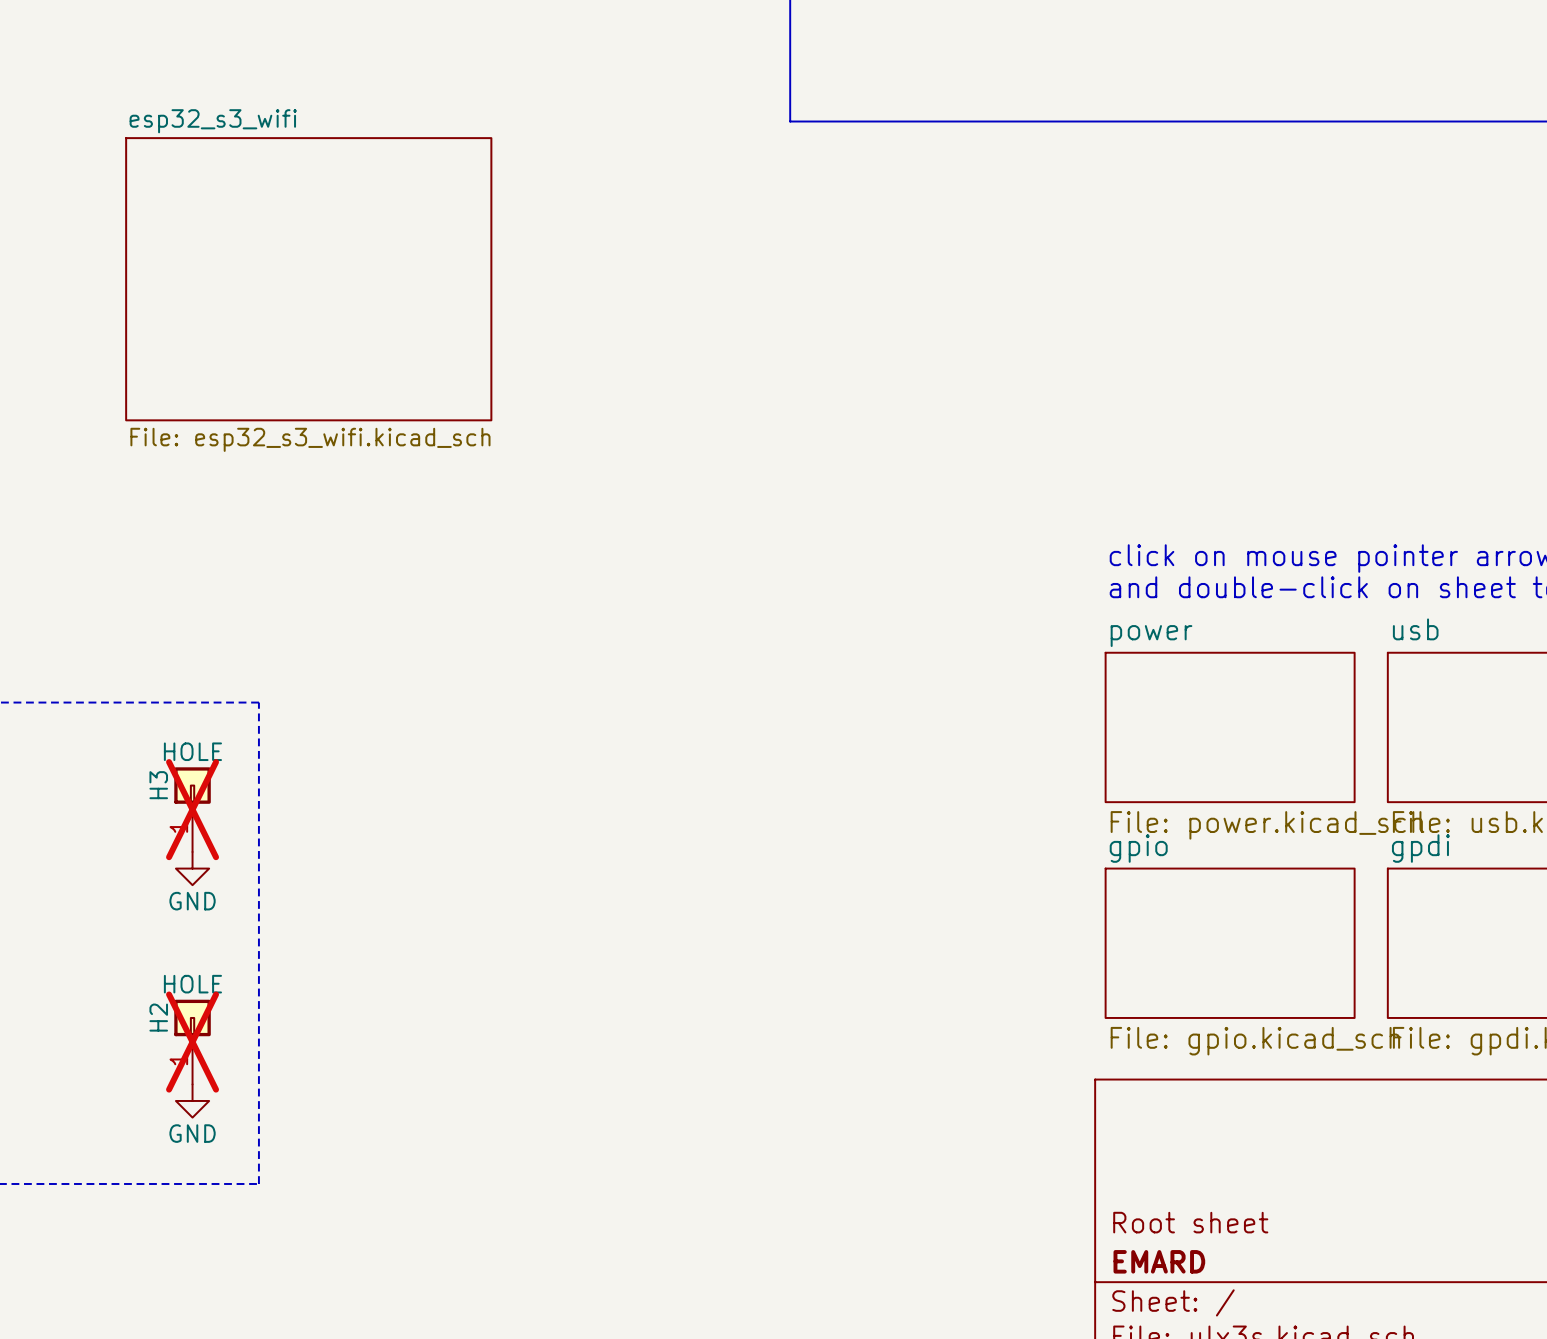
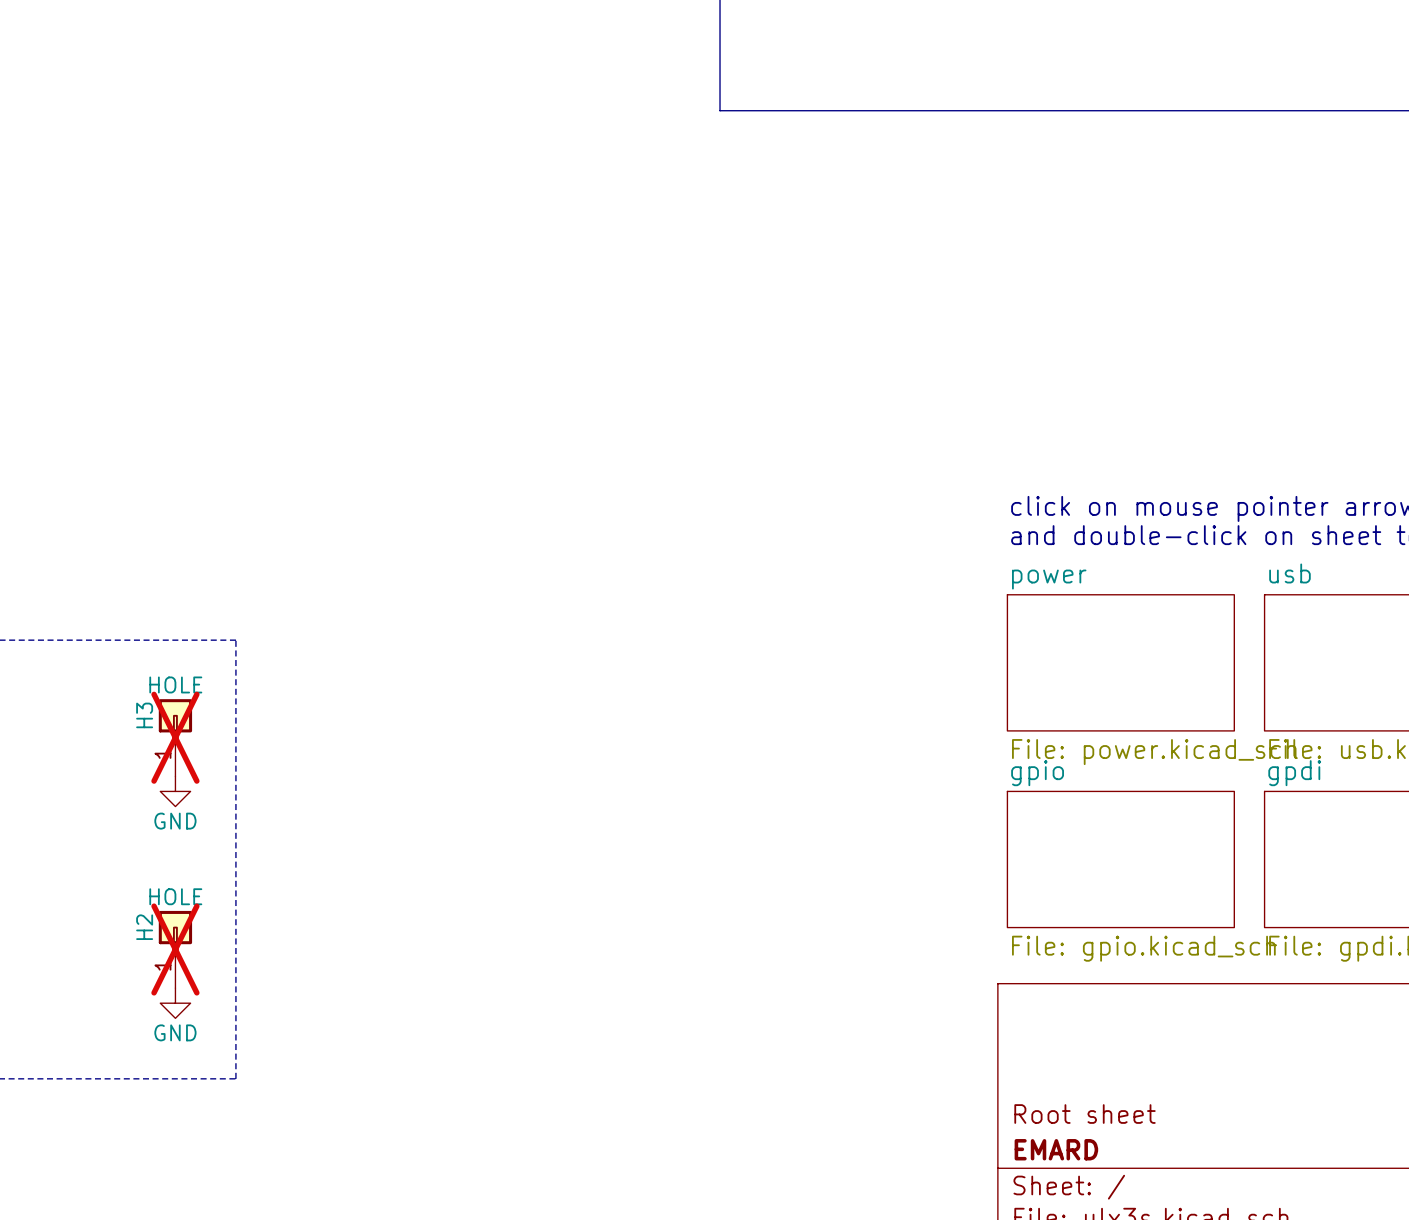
sheet esp32_s3_wifi: File: esp32_s3_wifi.kicad_sch (308, 279) -> none

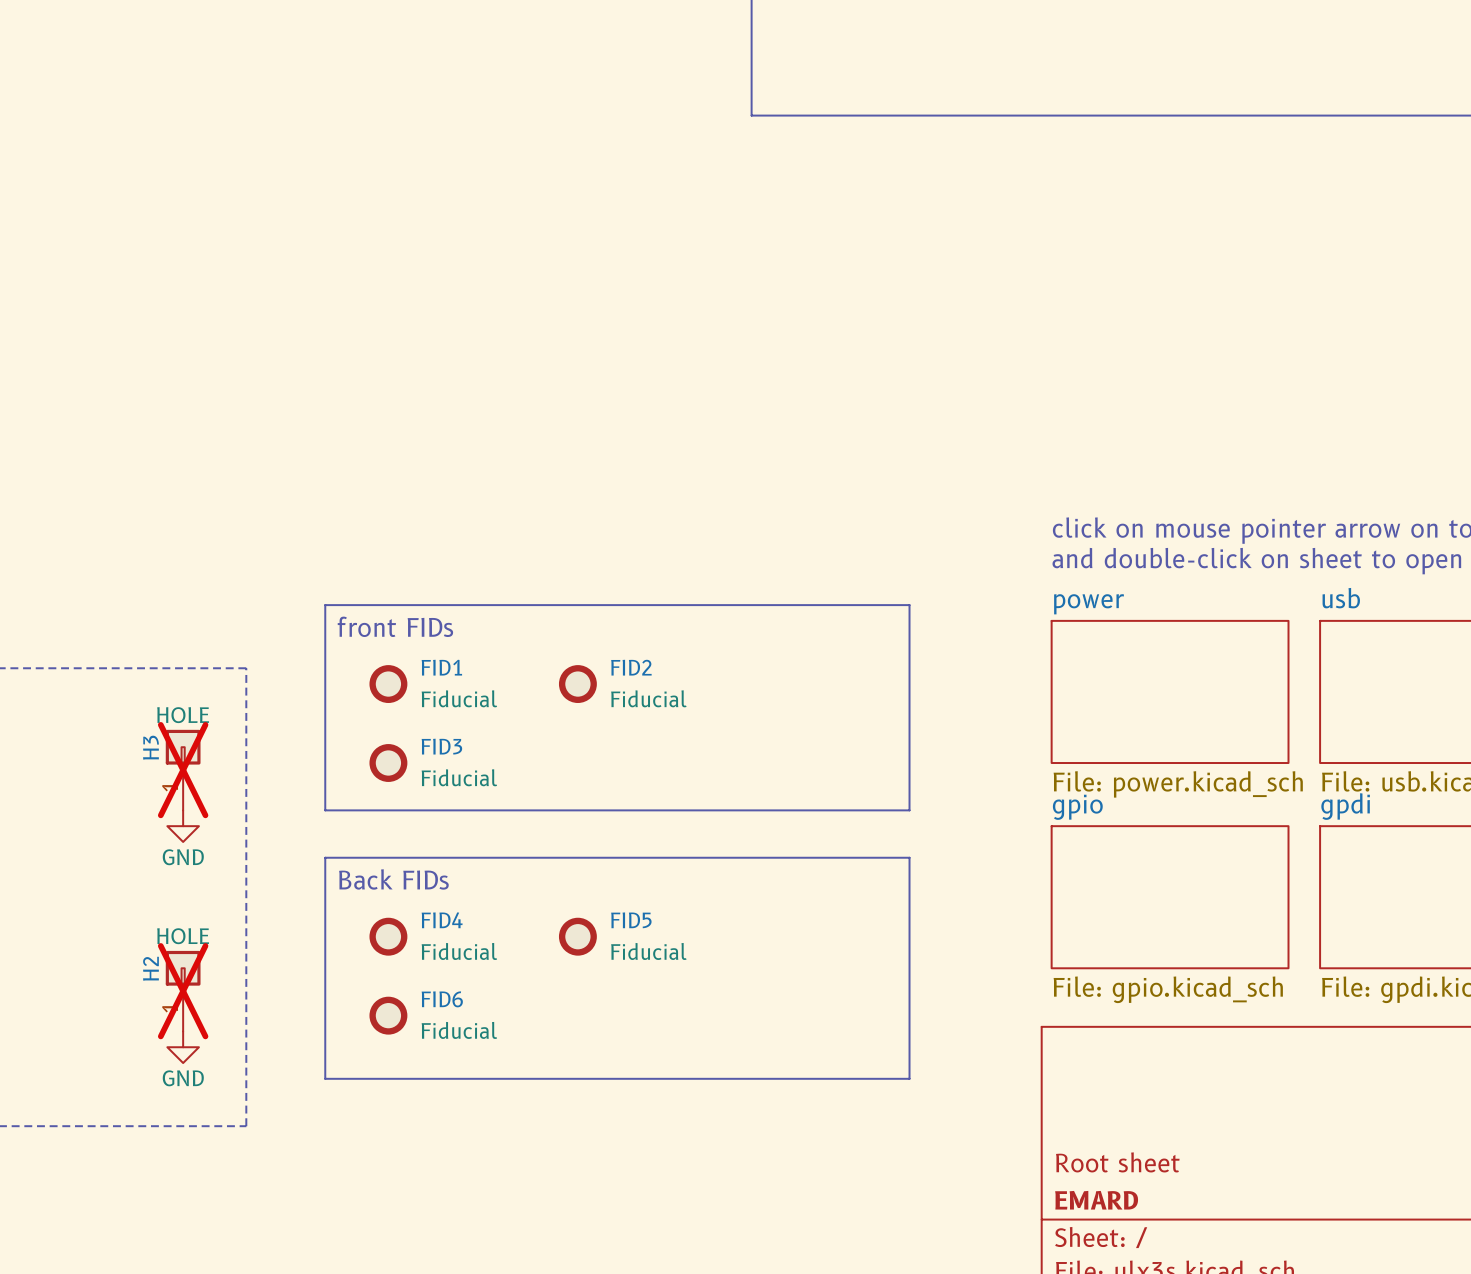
line: none -> (325, 605) (909, 605) (909, 810) (325, 810) (325, 605)
text: none -> front FIDs (395, 626)
FID1: none -> Fiducial (388, 684)
FID2: none -> Fiducial (577, 684)
FID3: none -> Fiducial (388, 763)
line: none -> (325, 857) (325, 1078) (909, 1078) (909, 857) (325, 857)
text: none -> Back FIDs (393, 879)
FID4: none -> Fiducial (388, 936)
FID5: none -> Fiducial (577, 936)
FID6: none -> Fiducial (388, 1015)

